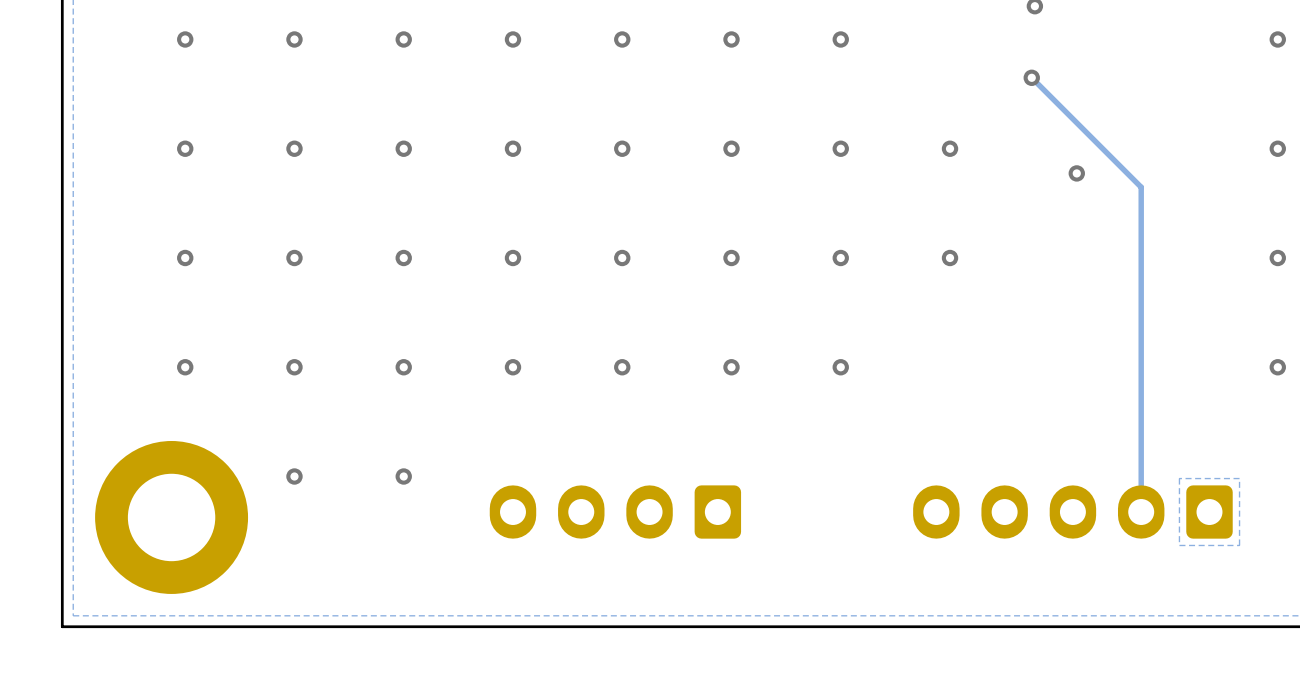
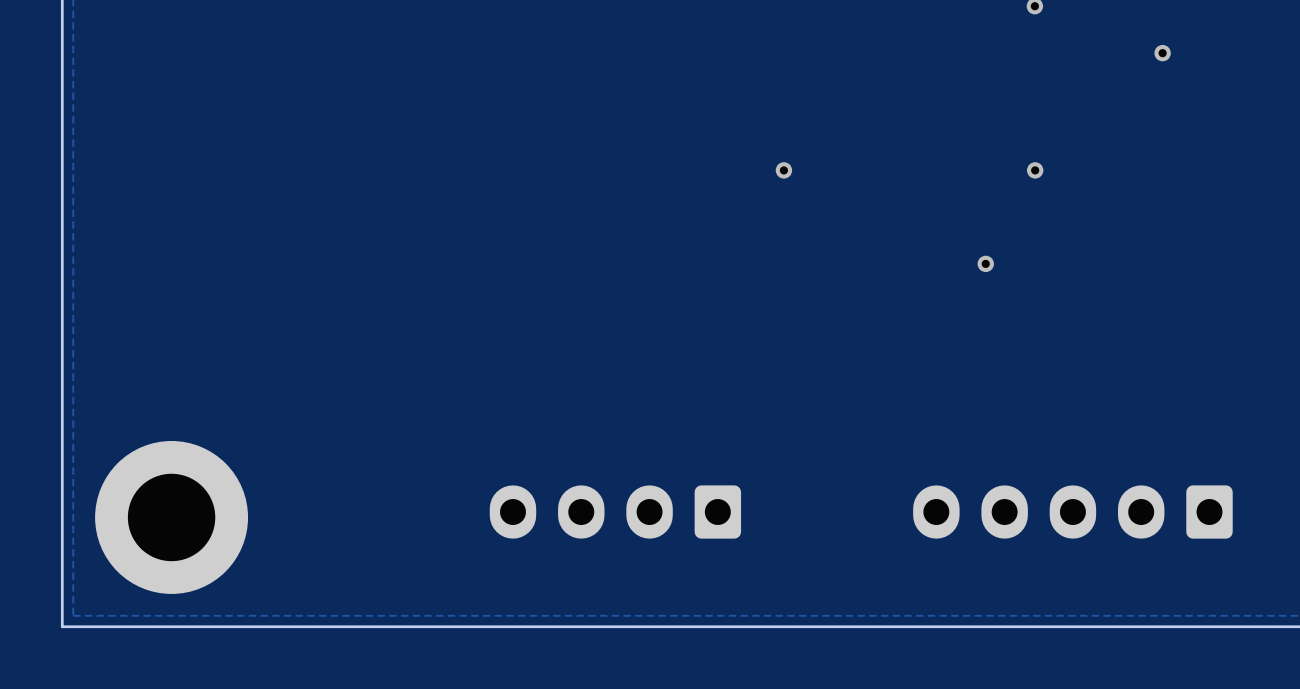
via: (185, 39) -> none
via: (294, 39) -> none
via: (403, 39) -> none
via: (512, 39) -> none
via: (622, 39) -> none
via: (731, 39) -> none
via: (840, 39) -> none
via: (1277, 39) -> none
via: none -> (1162, 53)
track: (1031, 77) (1141, 187) (1141, 512) -> none
via: (1031, 77) -> none
via: (185, 148) -> none
via: (294, 148) -> none
via: (403, 148) -> none
via: (512, 148) -> none
via: (622, 148) -> none
via: (731, 148) -> none
via: (840, 148) -> none
via: (950, 148) -> none
via: (1277, 148) -> none
via: none -> (783, 170)
via position: (1076, 173) -> (1035, 170)
via: (185, 257) -> none
via: (294, 257) -> none
via: (403, 257) -> none
via: (512, 257) -> none
via: (622, 257) -> none
via: (731, 257) -> none
via: (840, 257) -> none
via position: (950, 257) -> (985, 263)
via: (1277, 257) -> none
via: (185, 367) -> none
via: (294, 367) -> none
via: (403, 367) -> none
via: (512, 367) -> none
via: (622, 367) -> none
via: (731, 367) -> none
via: (840, 367) -> none
via: (1277, 367) -> none
via: (294, 476) -> none
via: (403, 476) -> none
zone outline: (1239, 478) (1239, 545) (1179, 545) (1179, 478) (1239, 478) -> none

